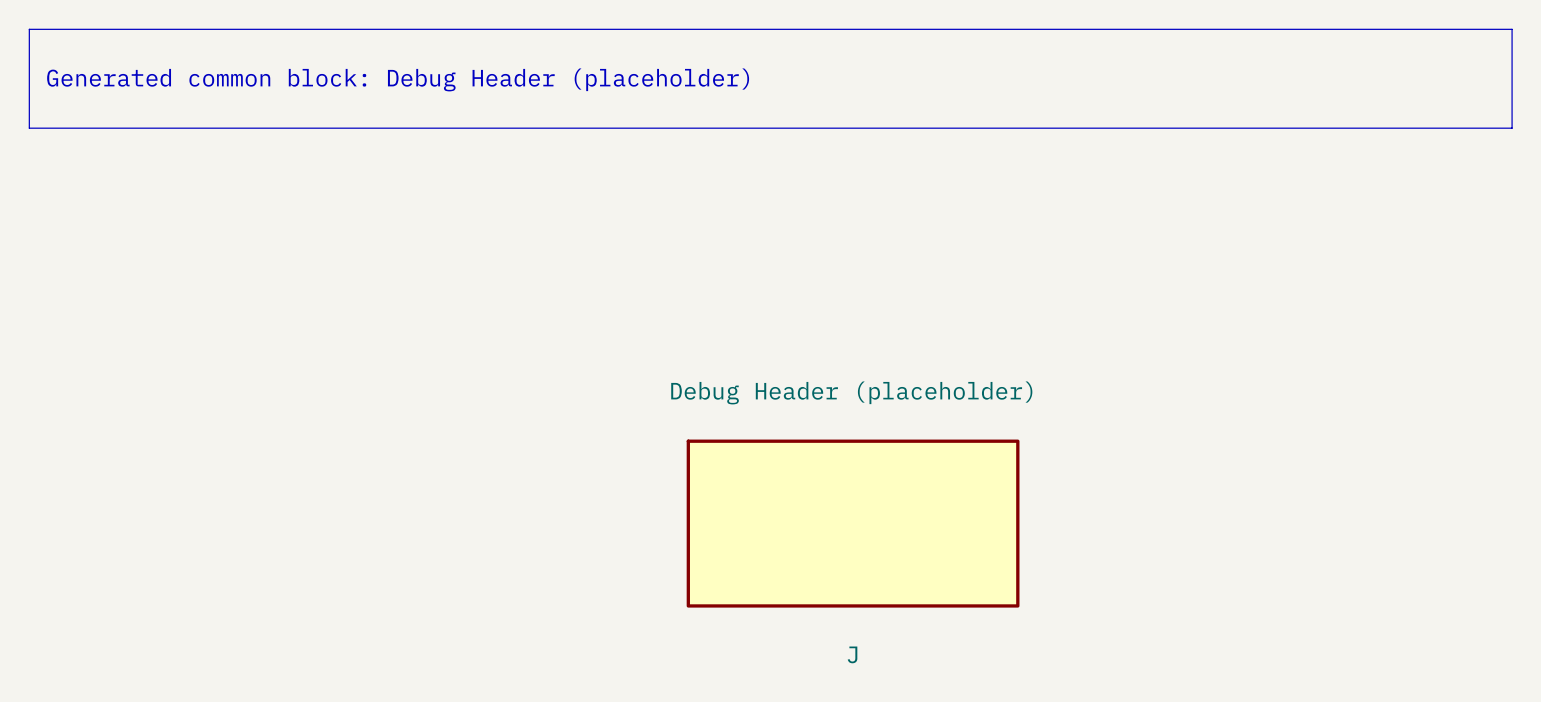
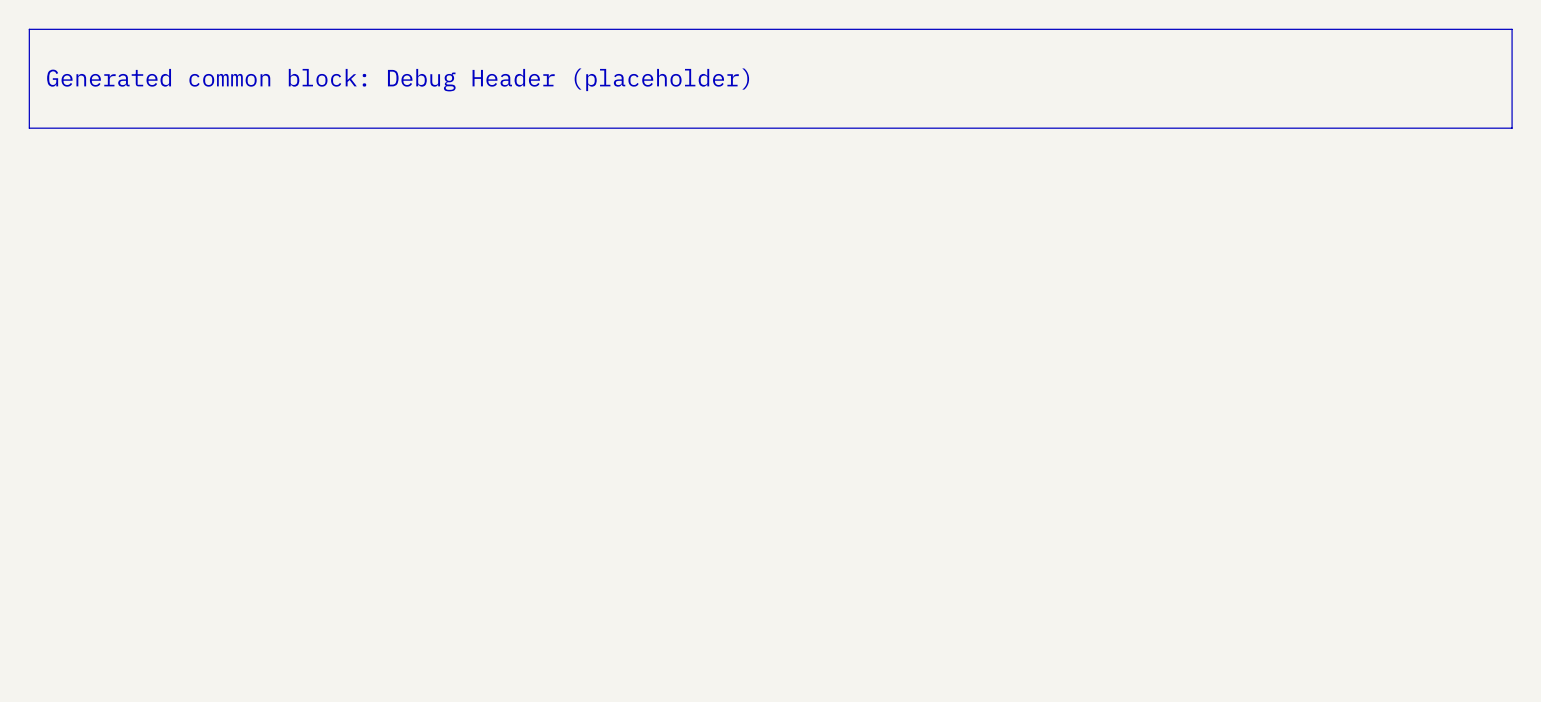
J: Debug Header (placeholder) (853, 523) -> none

